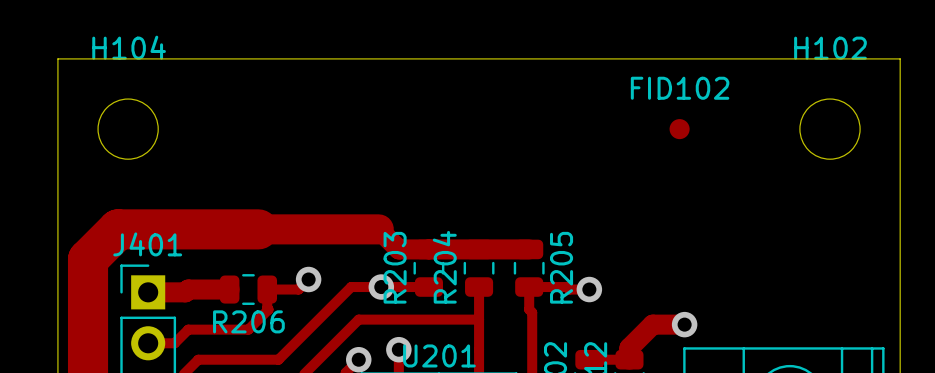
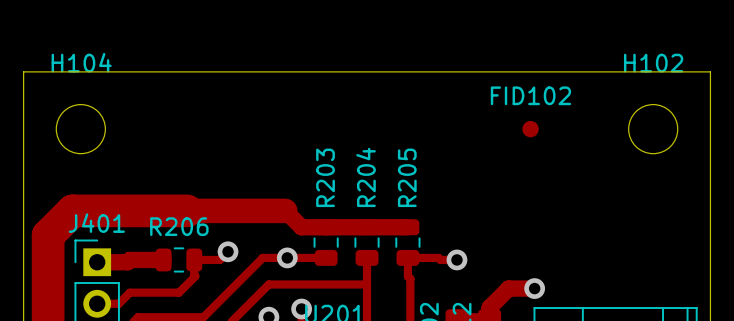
R203 name position: R203 (395, 267) -> R203 (325, 177)
R204 name position: R204 (444, 267) -> R204 (366, 177)
R205 name position: R205 (561, 267) -> R205 (407, 177)
R206 name position: R206 (248, 321) -> R206 (179, 226)

